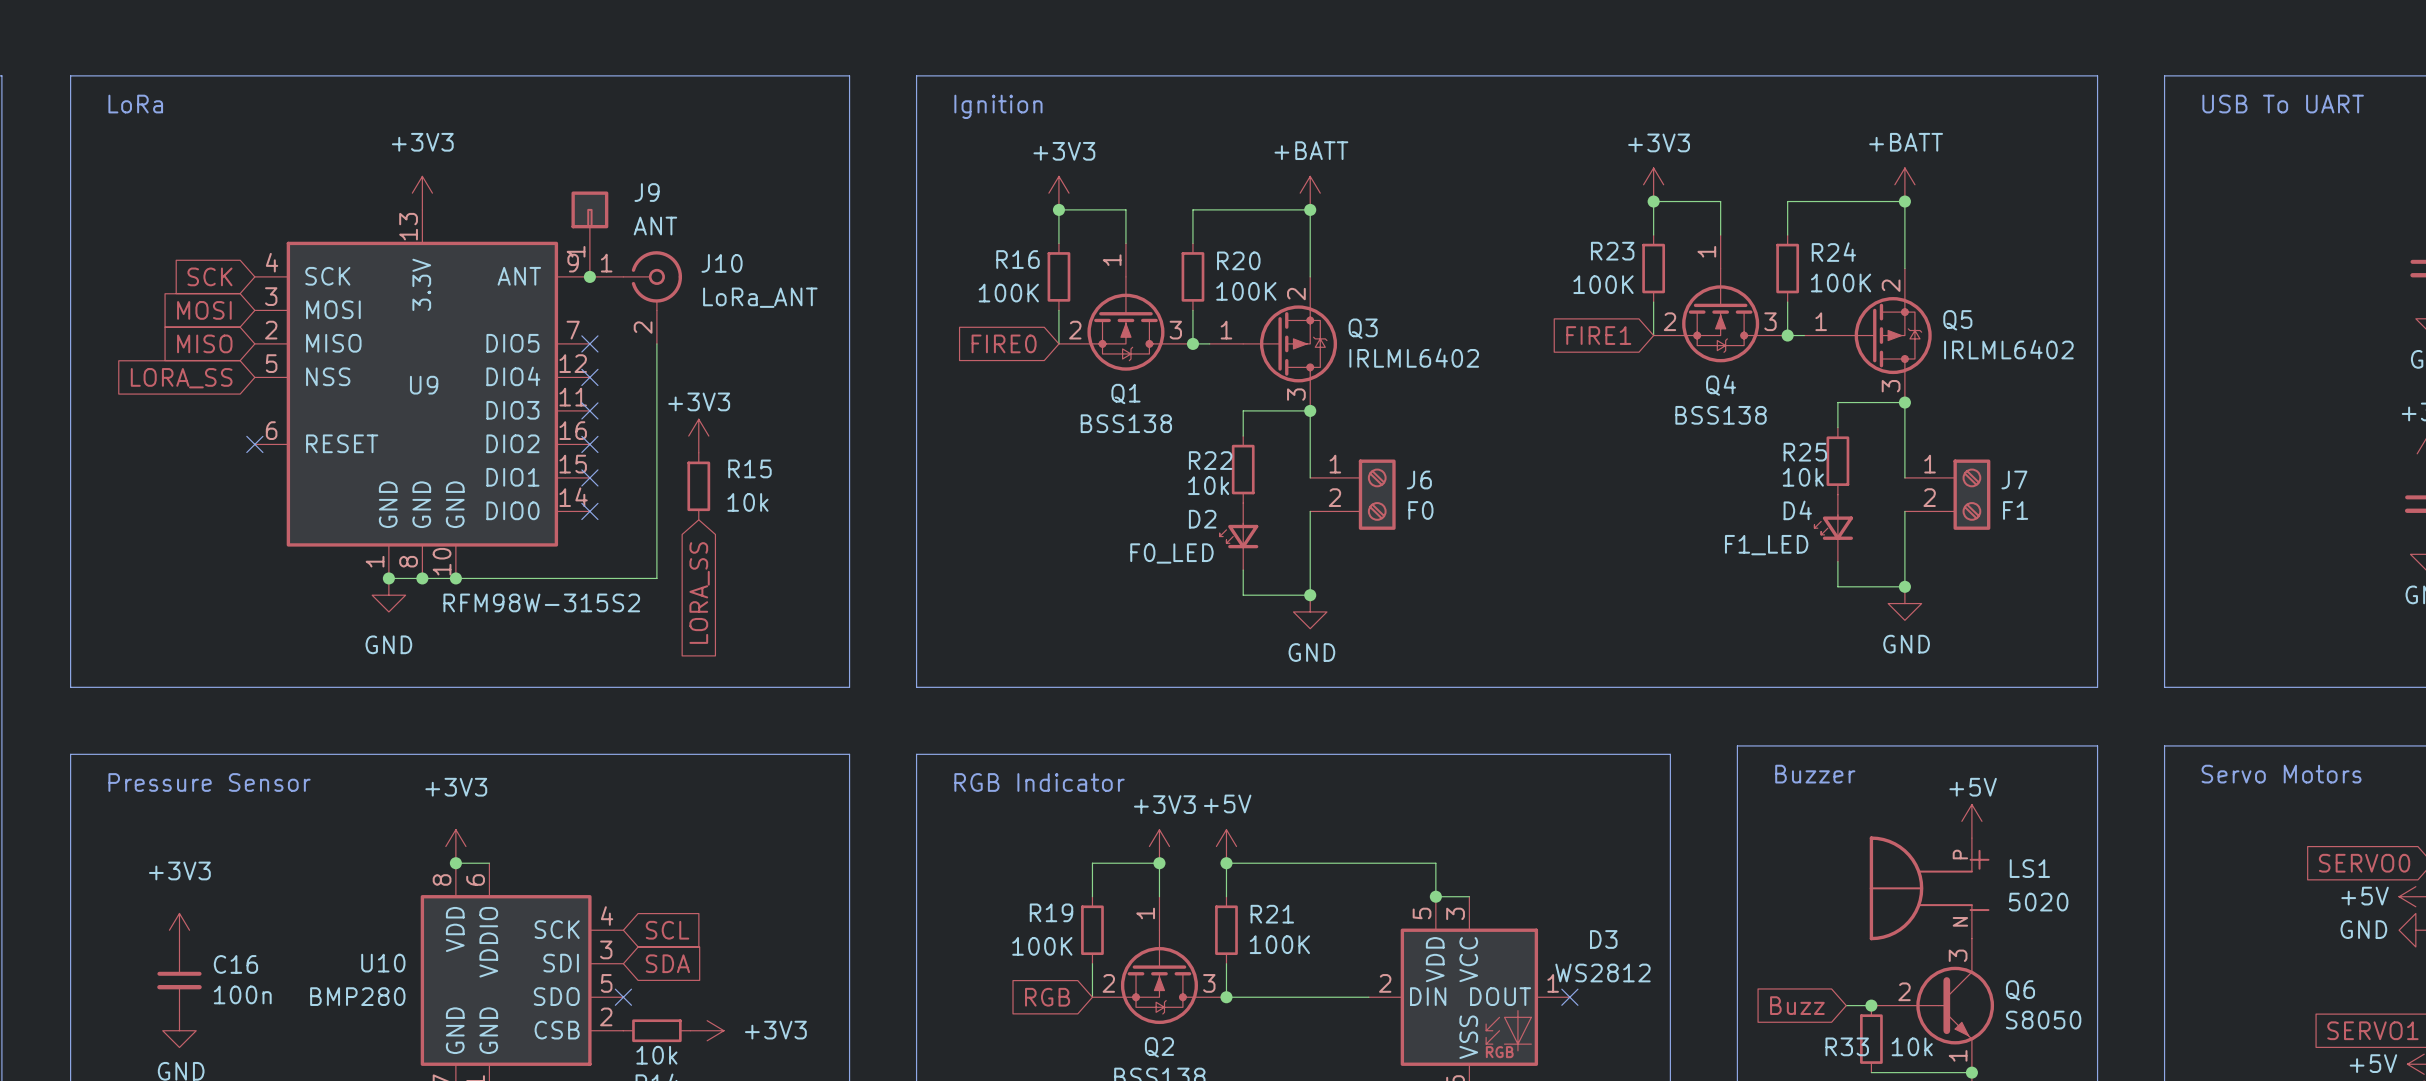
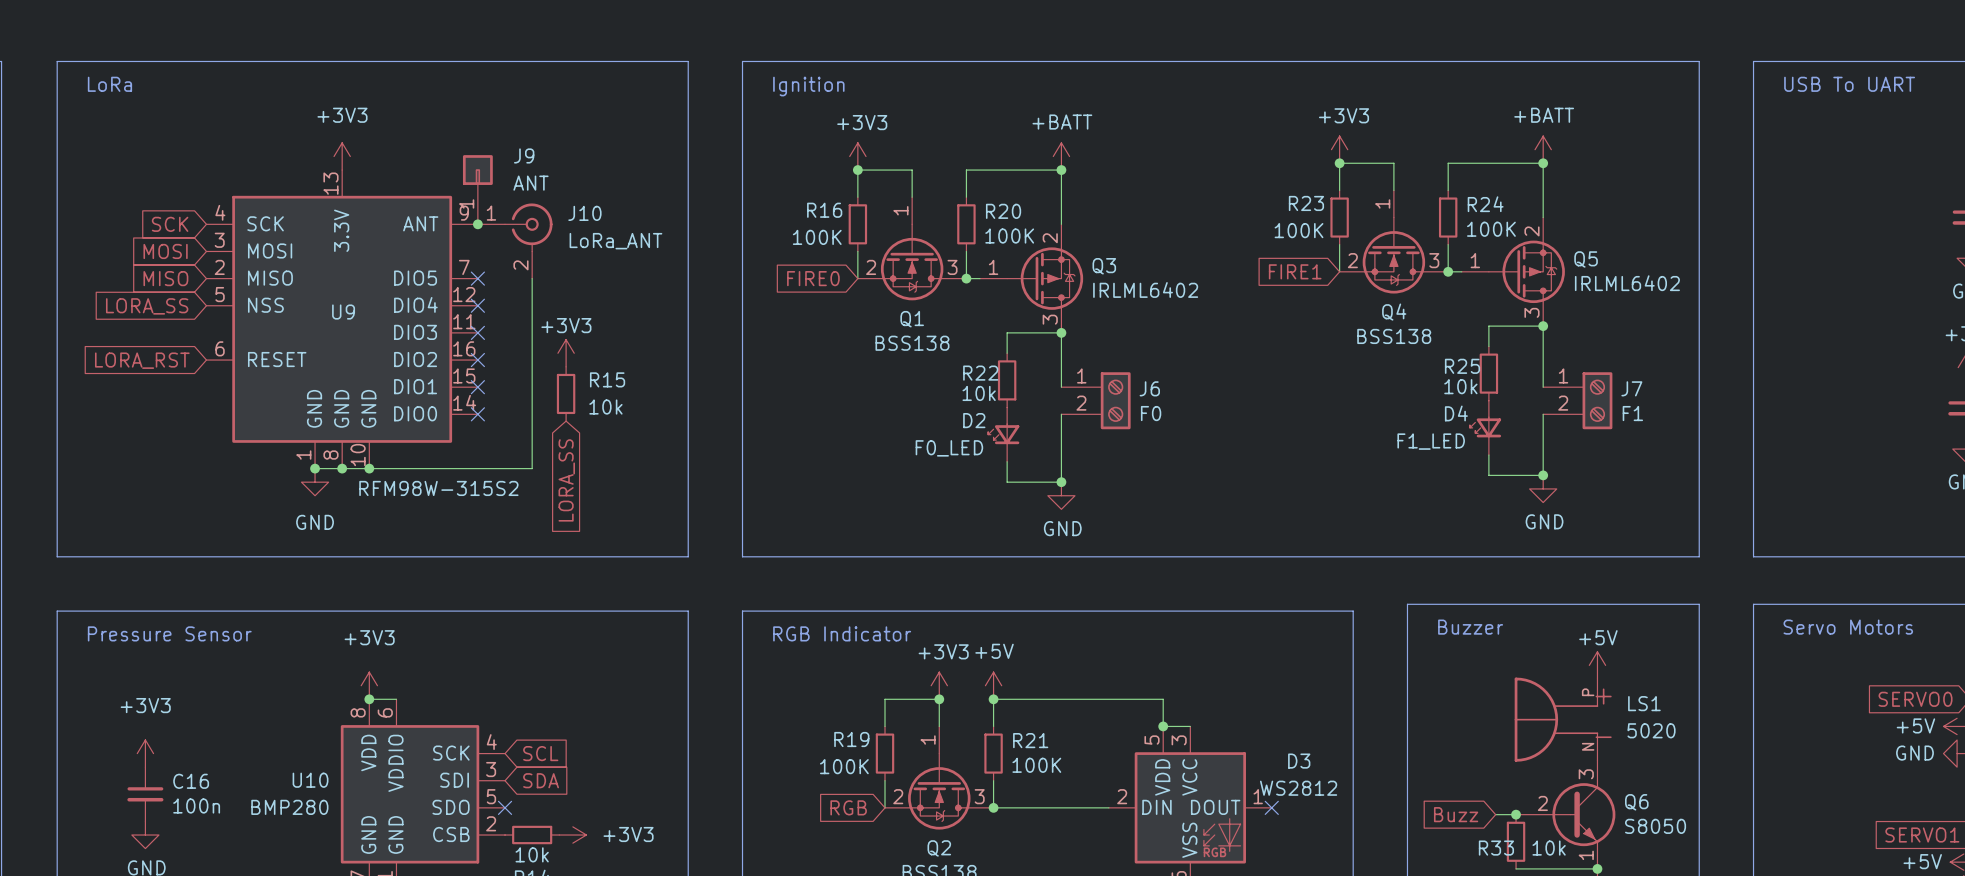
no-connect mark: (254, 444) -> none
global label: none -> LORA_RST (142, 360)

